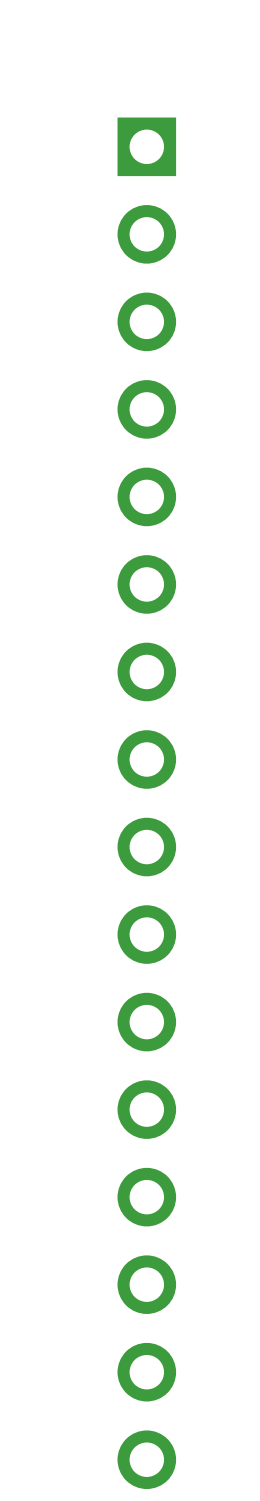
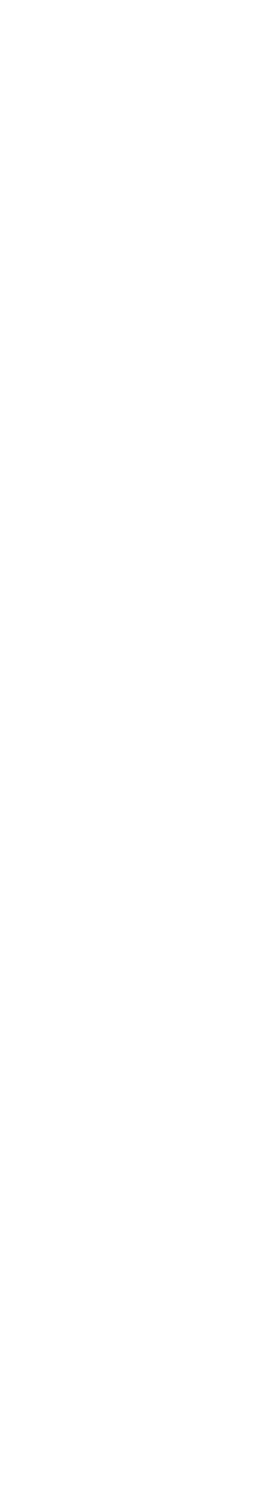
part: (146, 803) -> none

